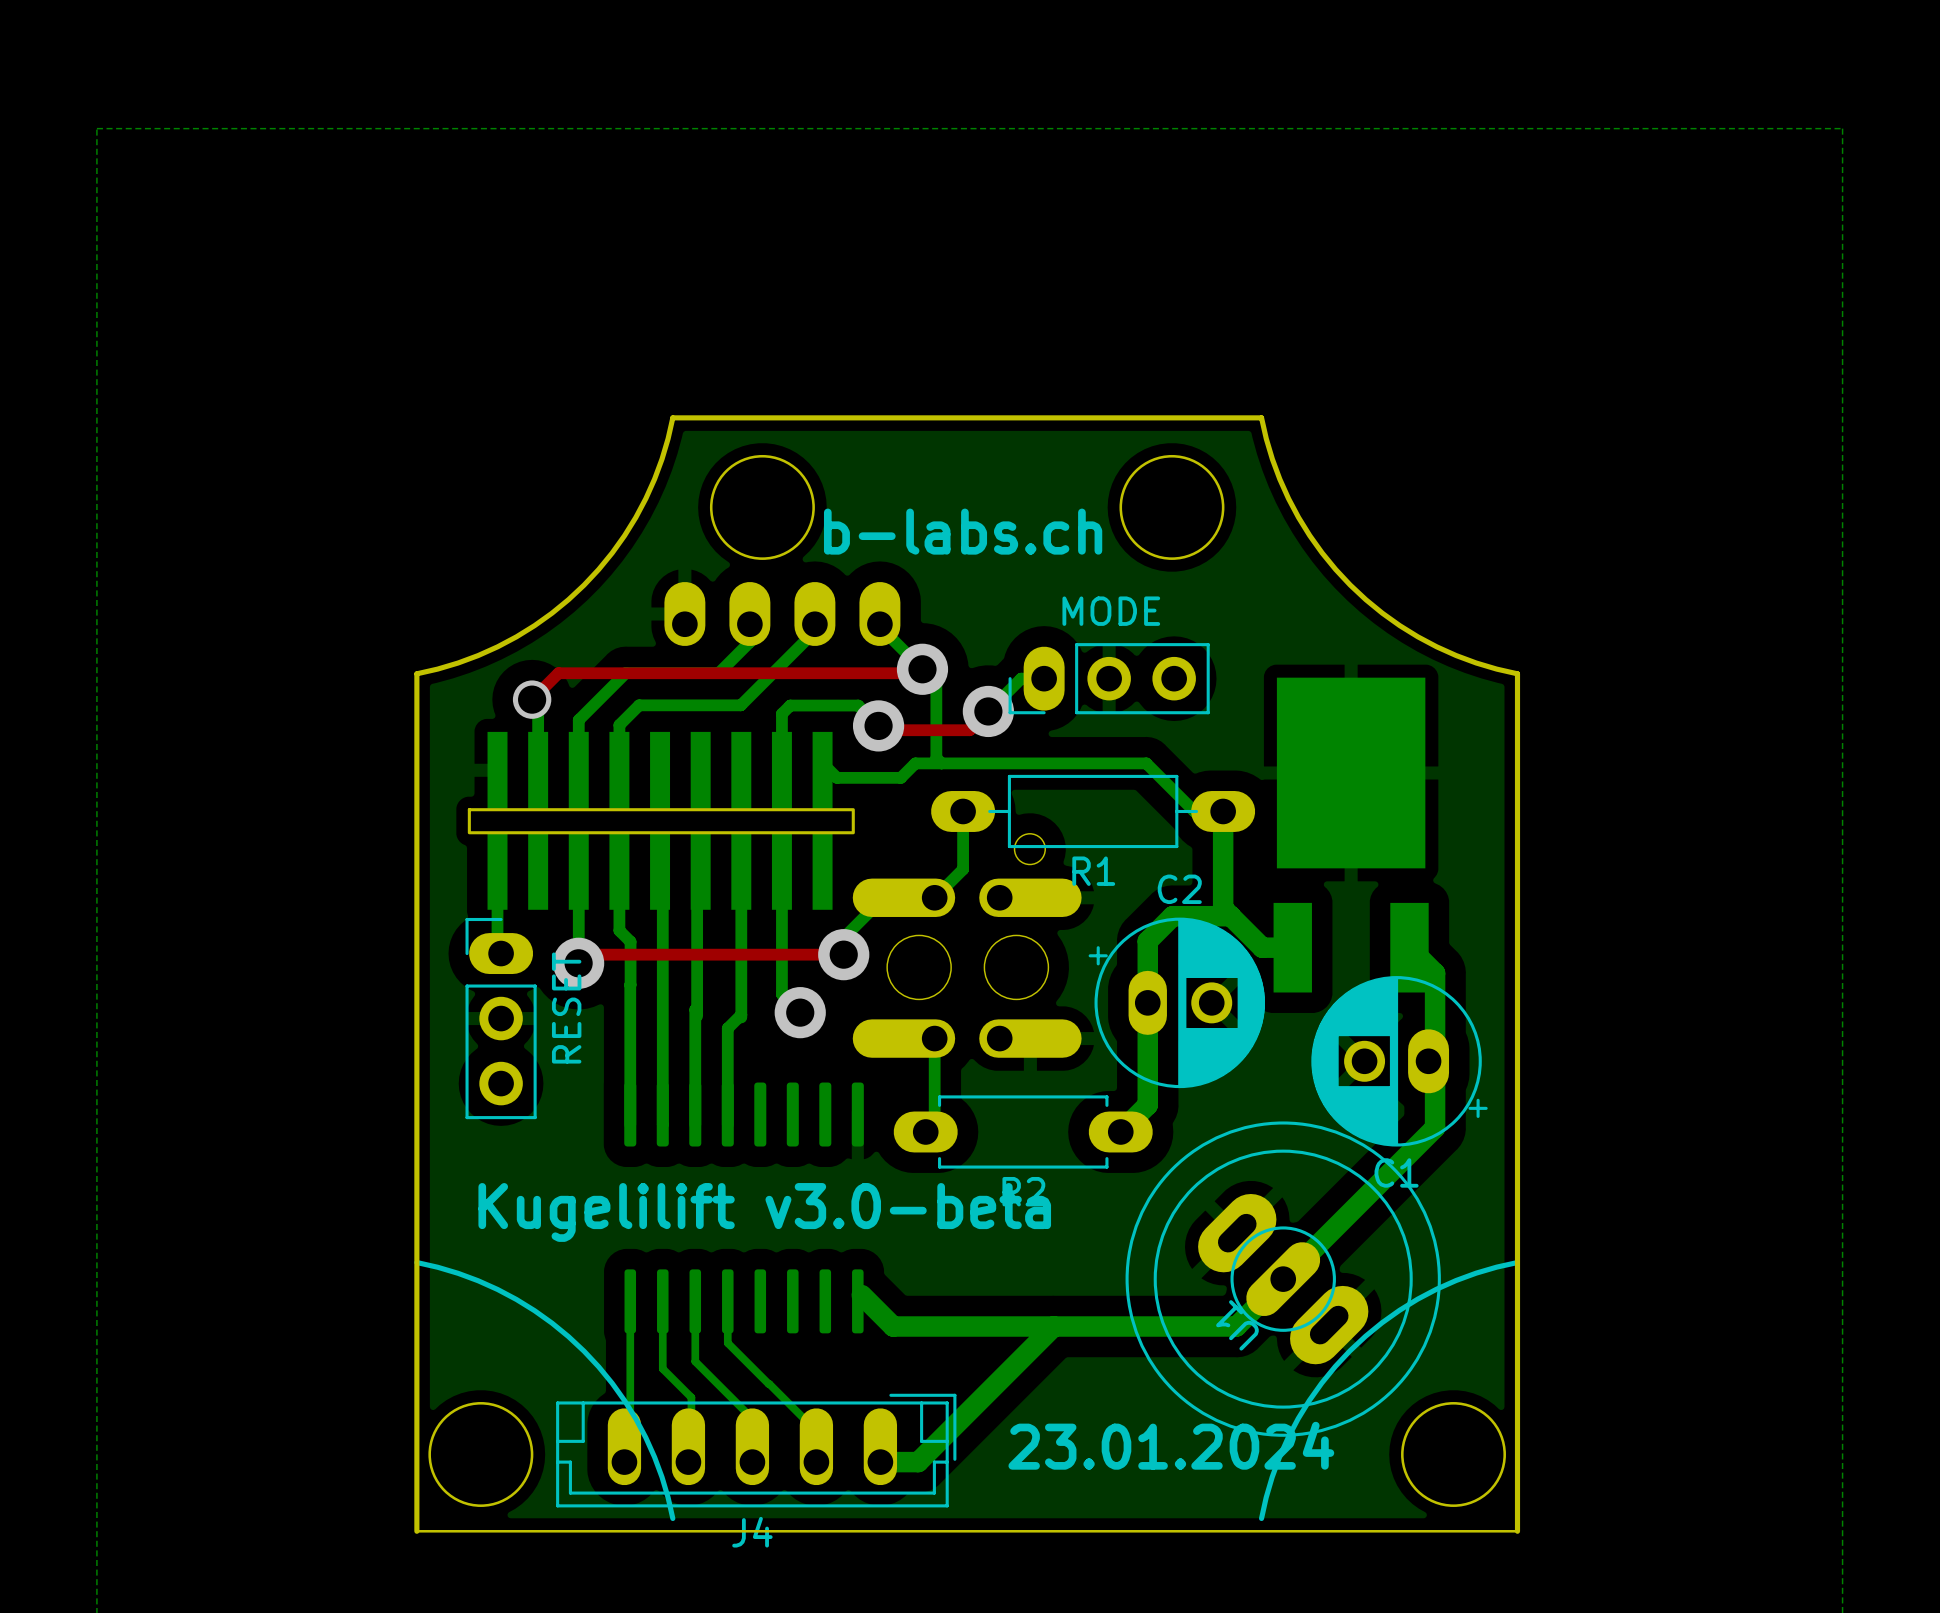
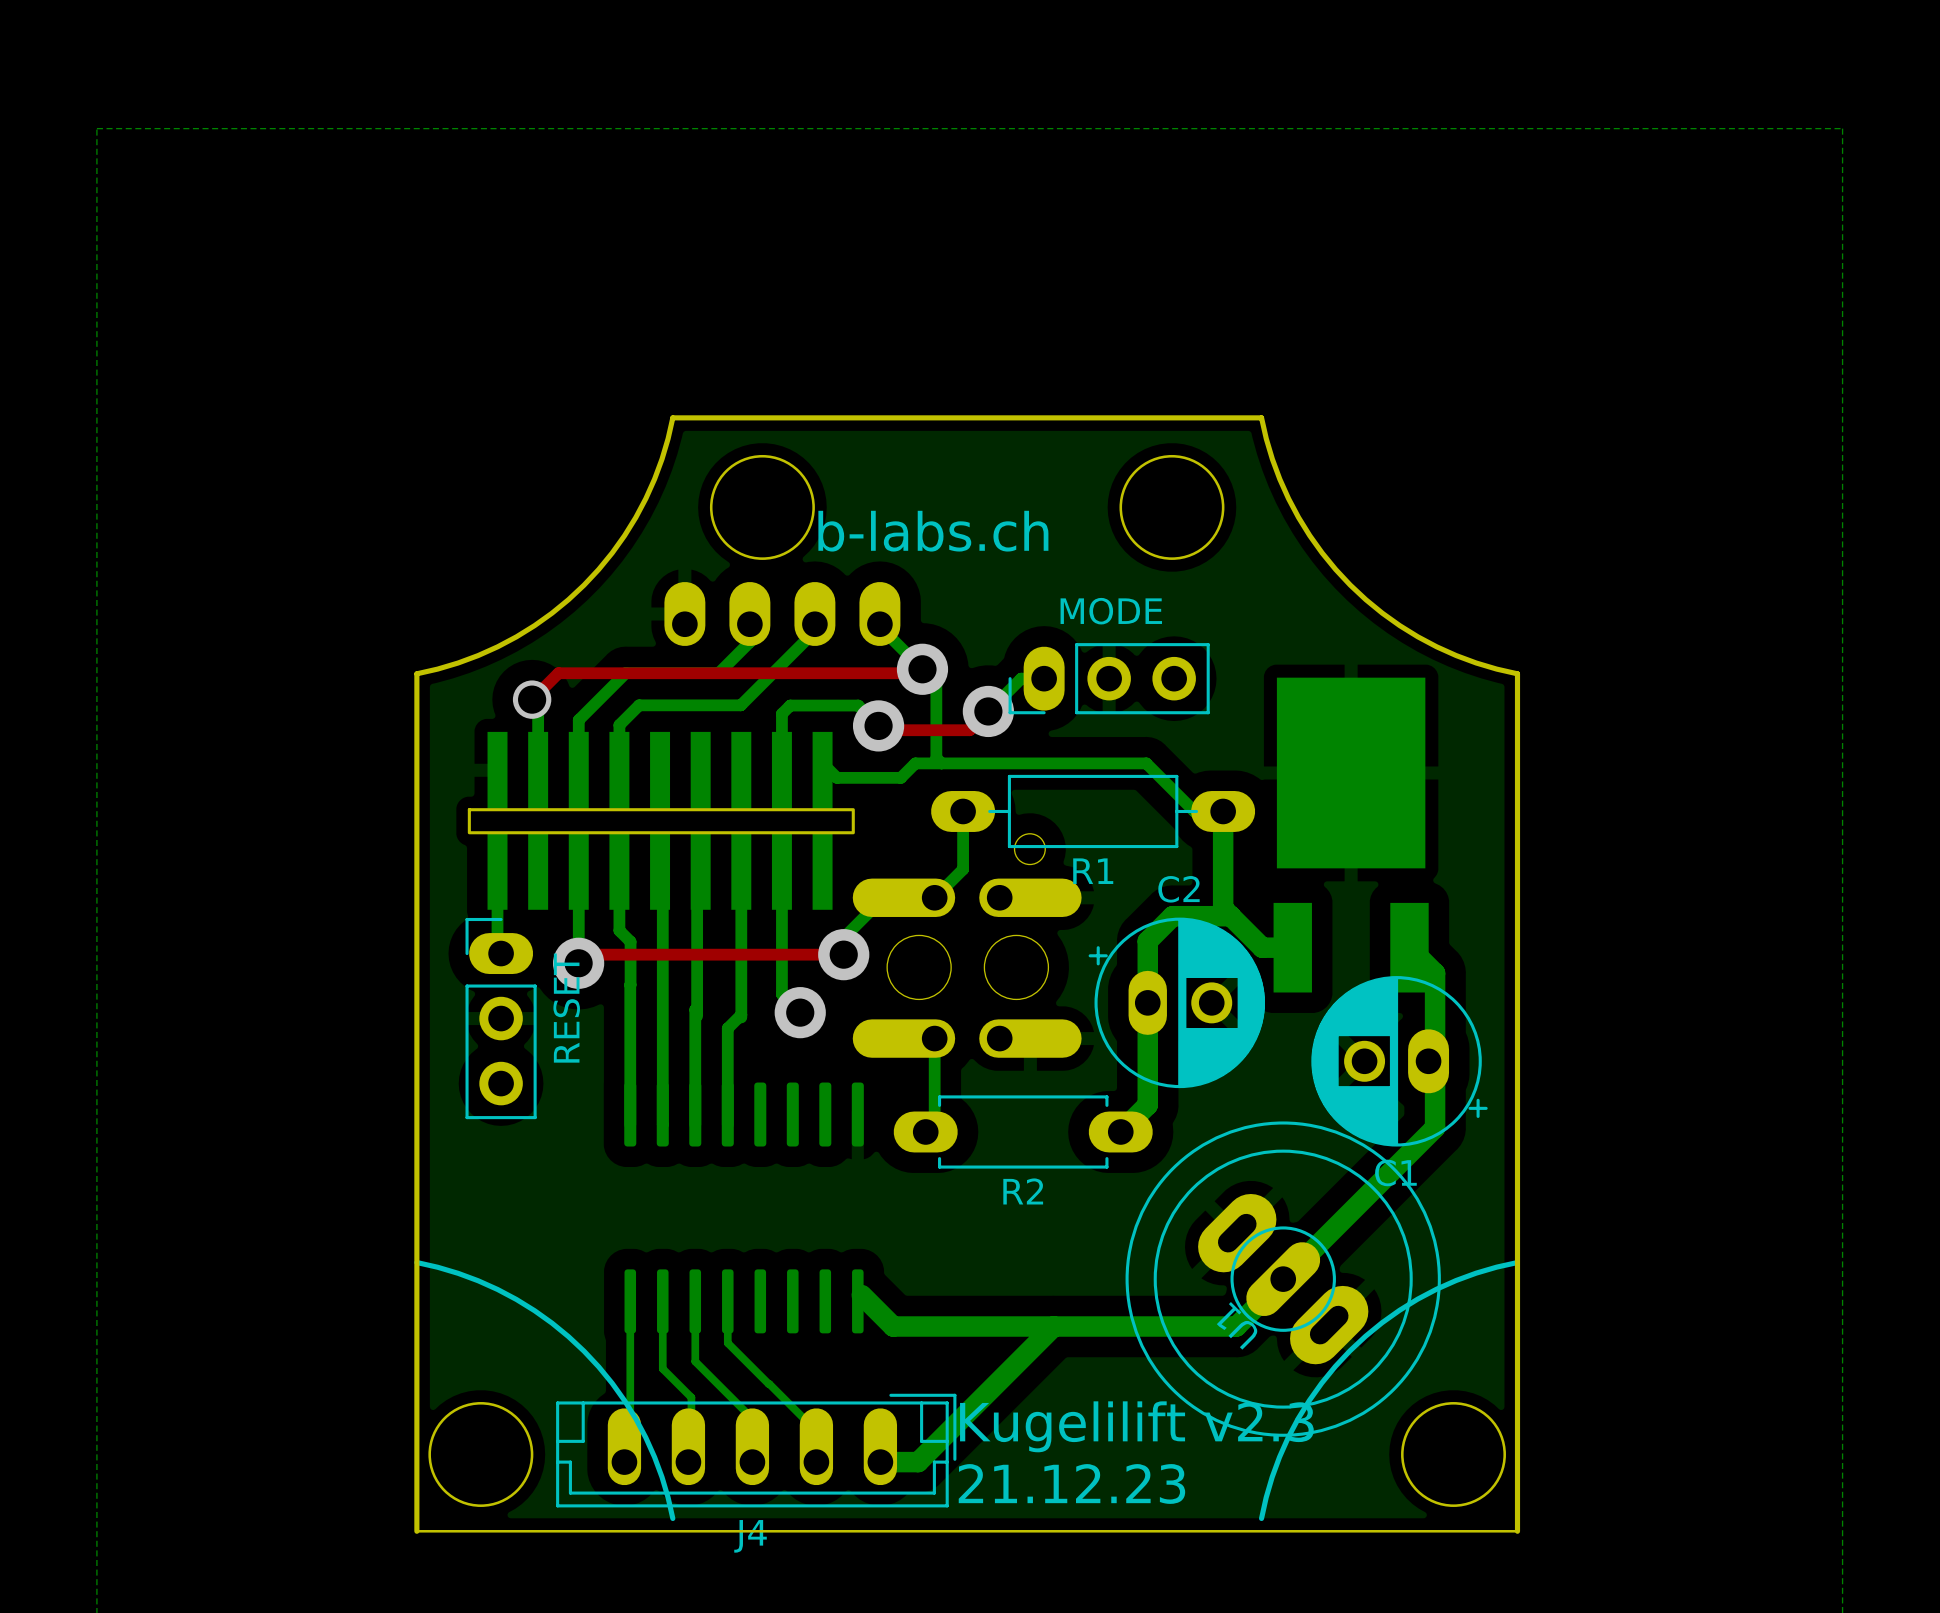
text: Kugelilift v3.0-beta (764, 1212) -> none
text: none -> Kugelilift v2.3 (1136, 1426)
text: 23.01.2024 (1171, 1445) -> none
text: none -> 21.12.23 (1071, 1483)

